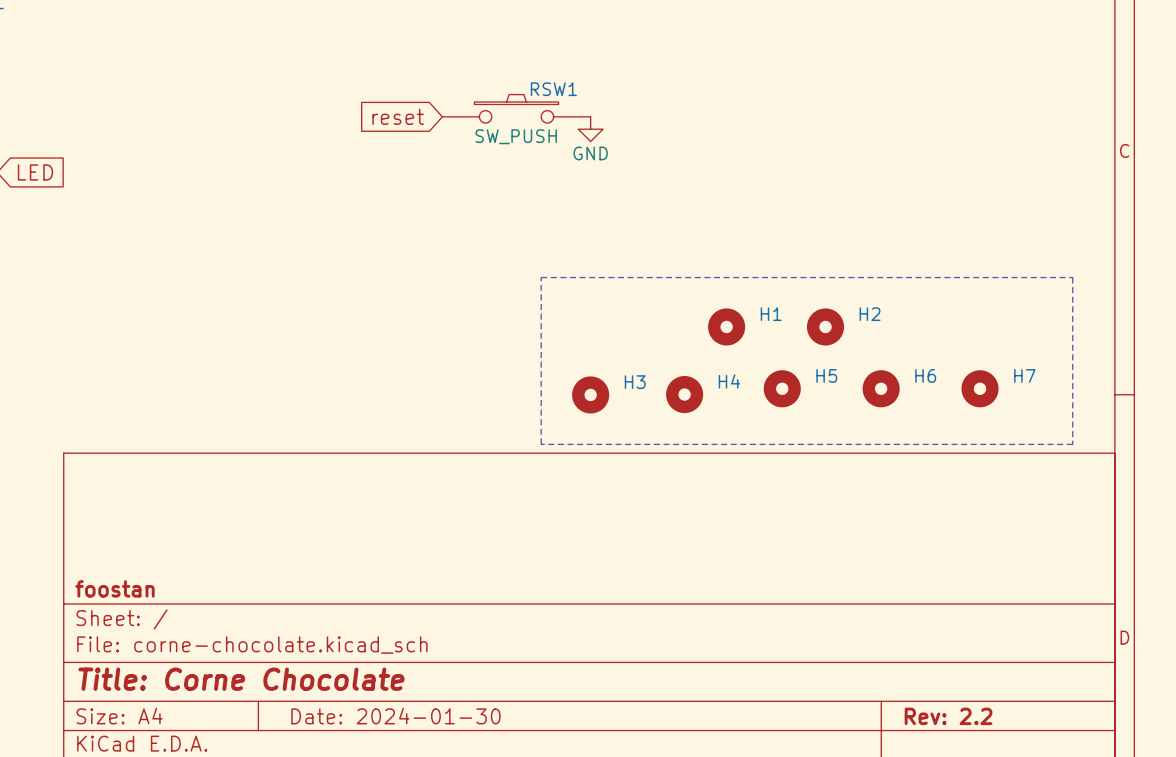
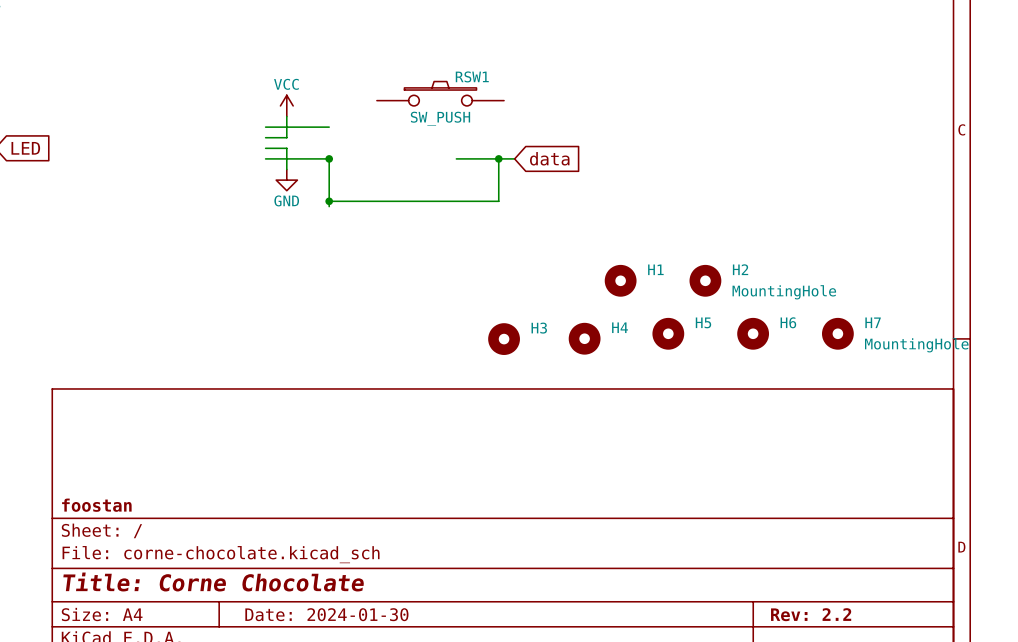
global label: reset (398, 116) -> none
power symbol: none -> VCC (286, 105)
power symbol: GND (590, 129) -> none
wire: none -> (286, 116) (286, 137) (265, 137)
wire: none -> (265, 127) (329, 127)
wire: none -> (265, 148) (286, 148) (286, 169)
wire: none -> (265, 158) (329, 158) (329, 206)
junction: none -> (329, 158)
wire: none -> (456, 158) (514, 158)
wire: none -> (498, 158) (498, 201) (329, 201)
junction: none -> (498, 158)
global label: none -> data (549, 158)
power symbol: none -> GND (286, 180)
junction: none -> (329, 201)
line: (541, 277) (1072, 277) (1072, 444) (541, 444) (541, 277) -> none
H2 value: none -> MountingHole (784, 292)
H7 value: none -> MountingHole (916, 345)

